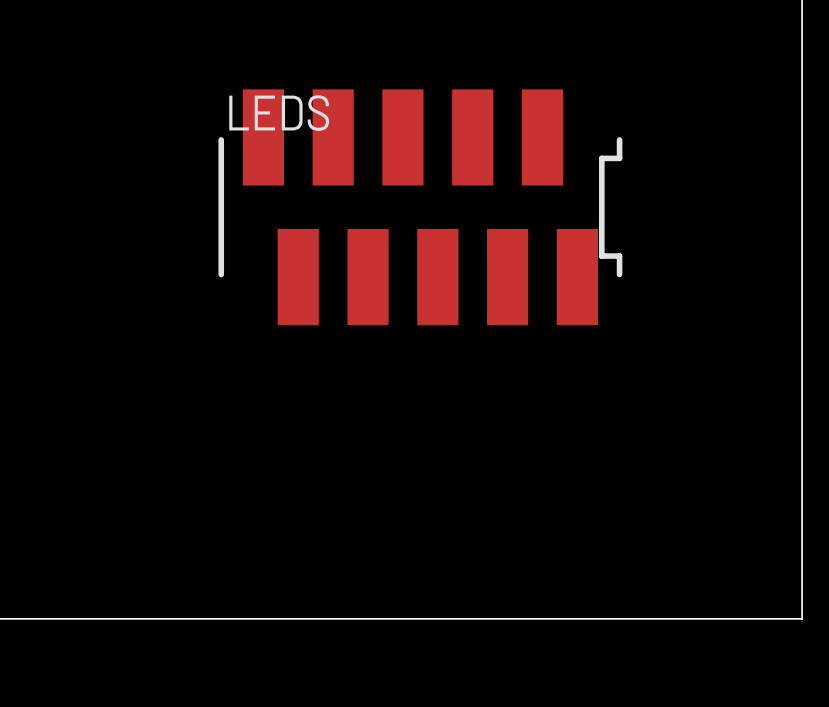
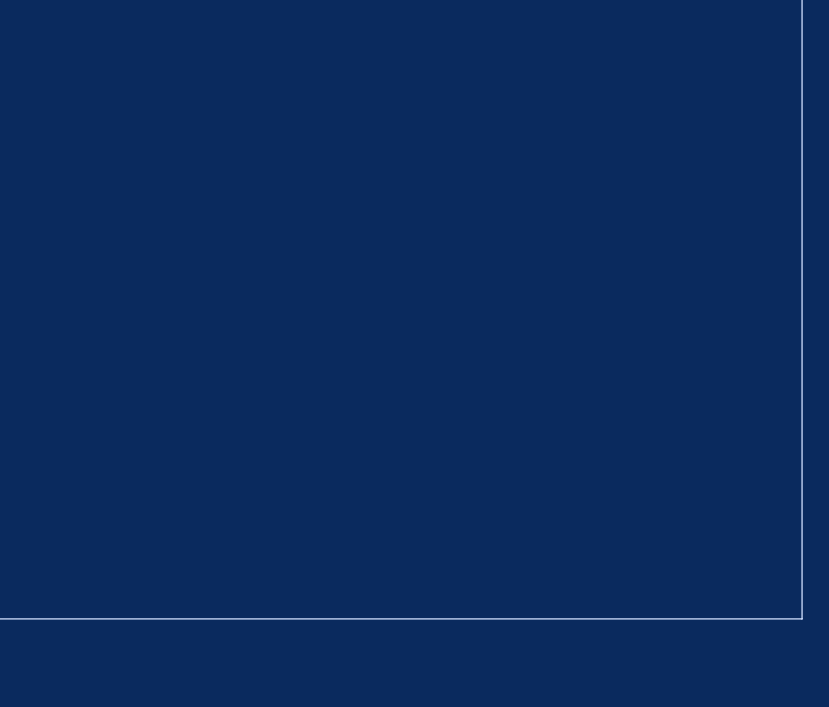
LEDS: (420, 207) -> none

